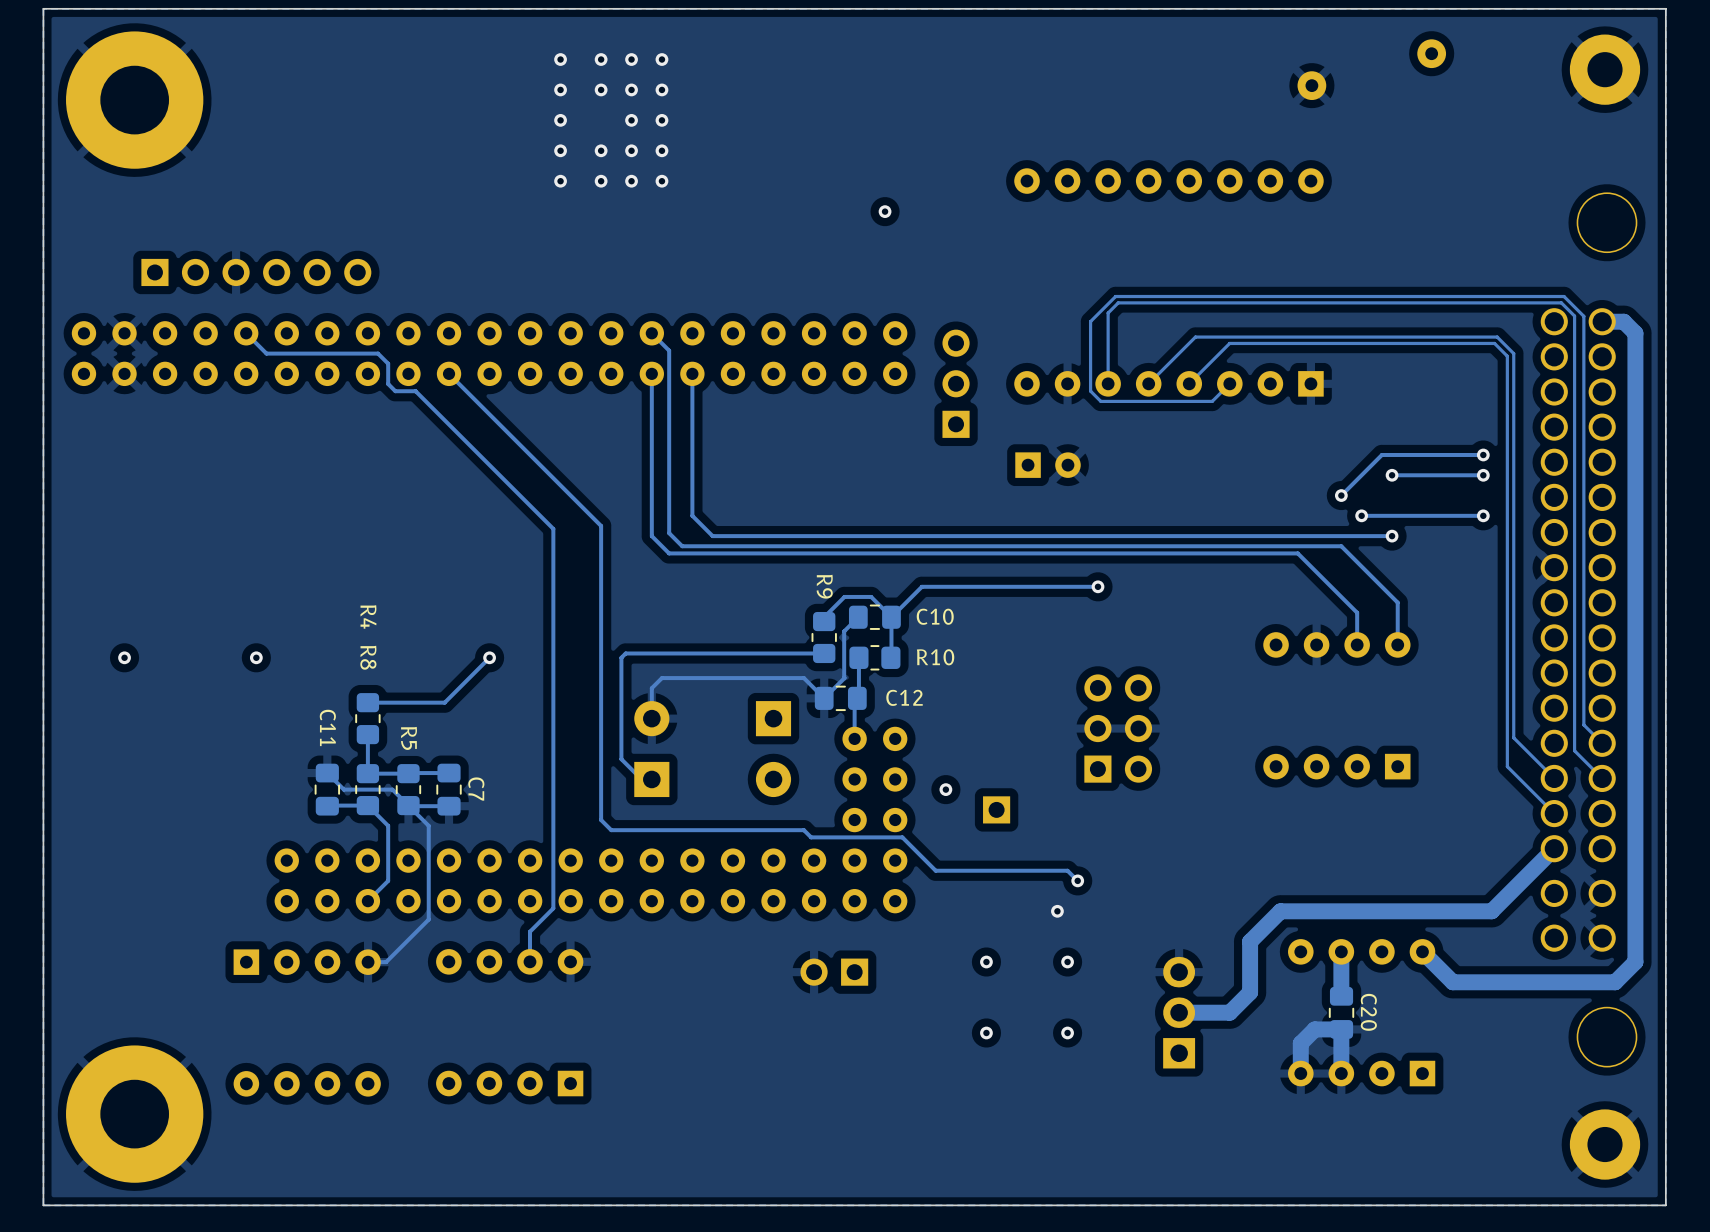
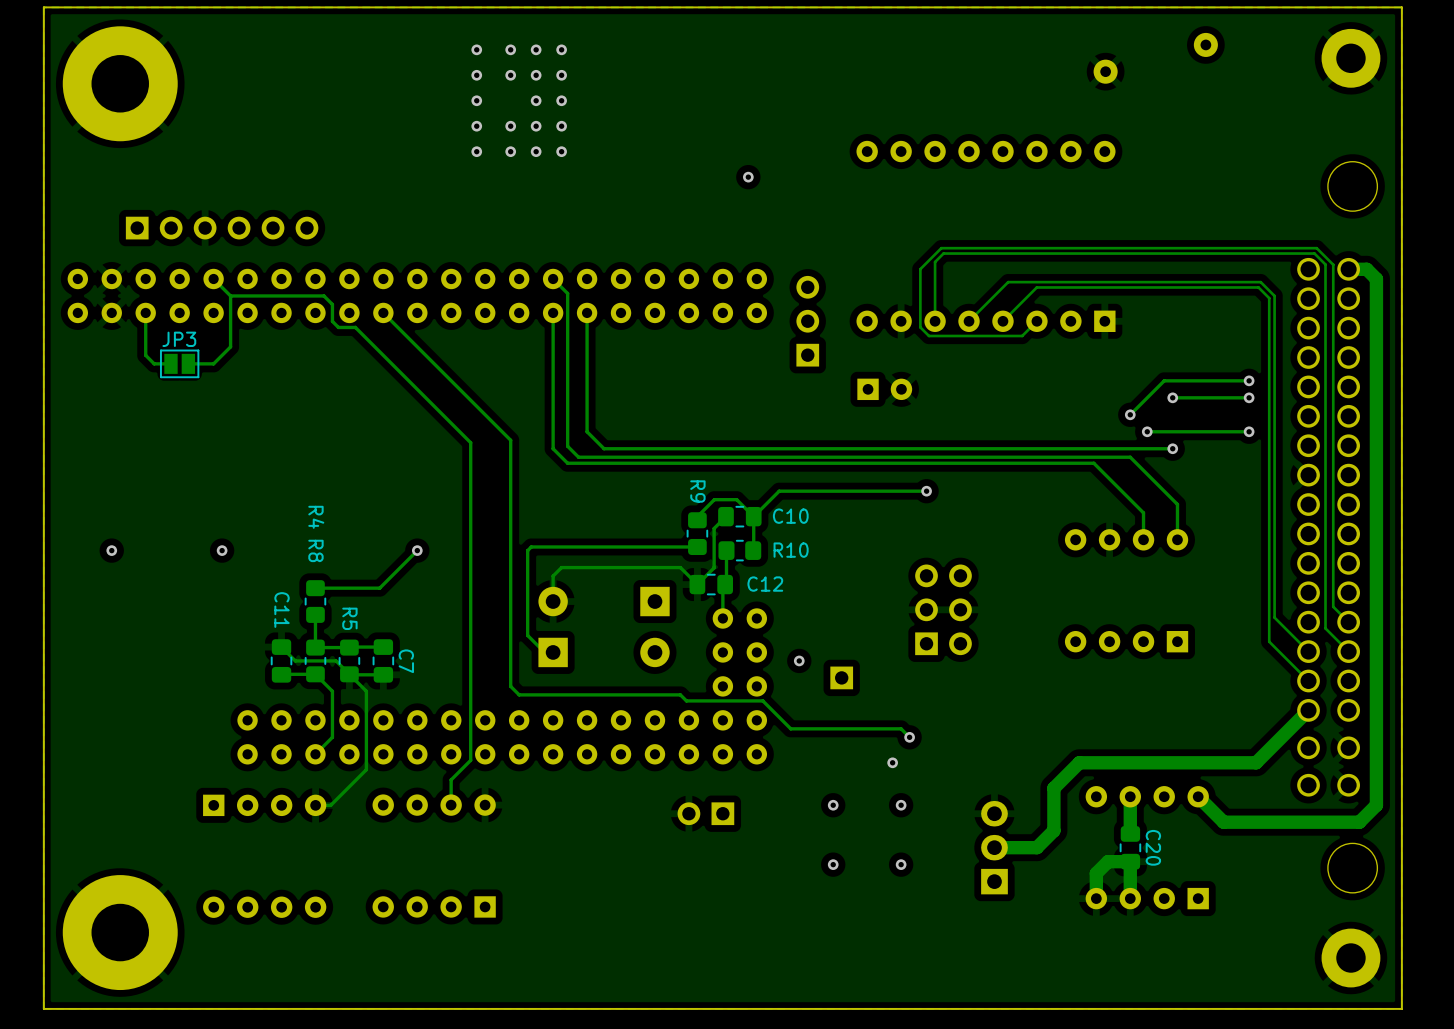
track: none -> (230, 295) (230, 346) (213, 363) (188, 363)
track: none -> (145, 312) (145, 355) (154, 363) (170, 363)
JP3: none -> (179, 363)

